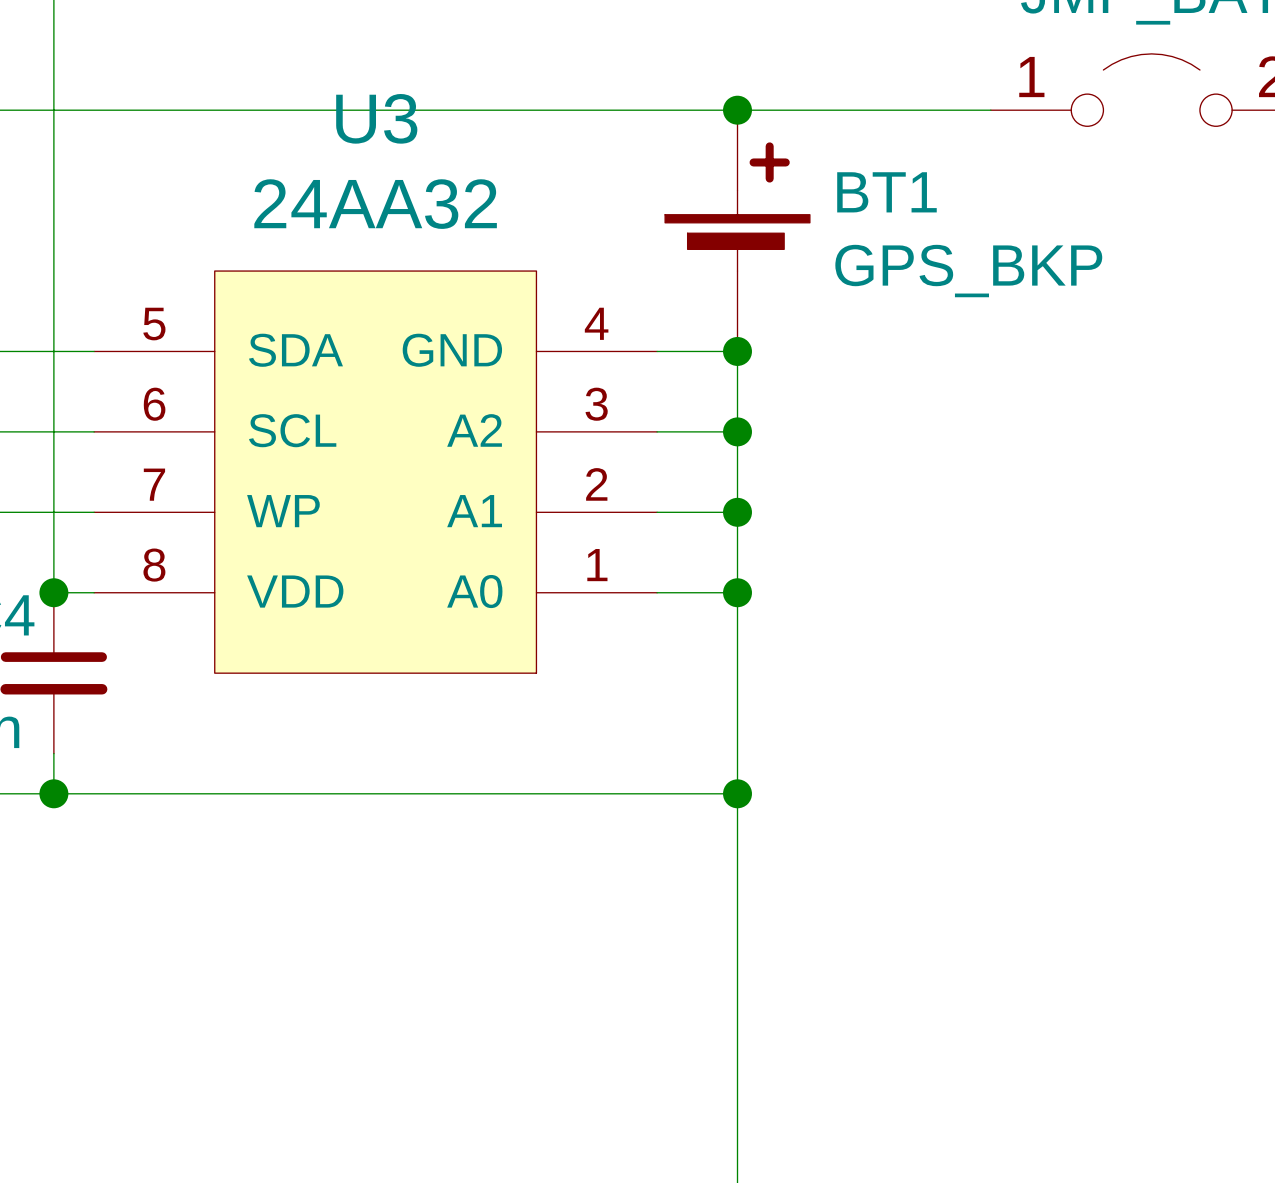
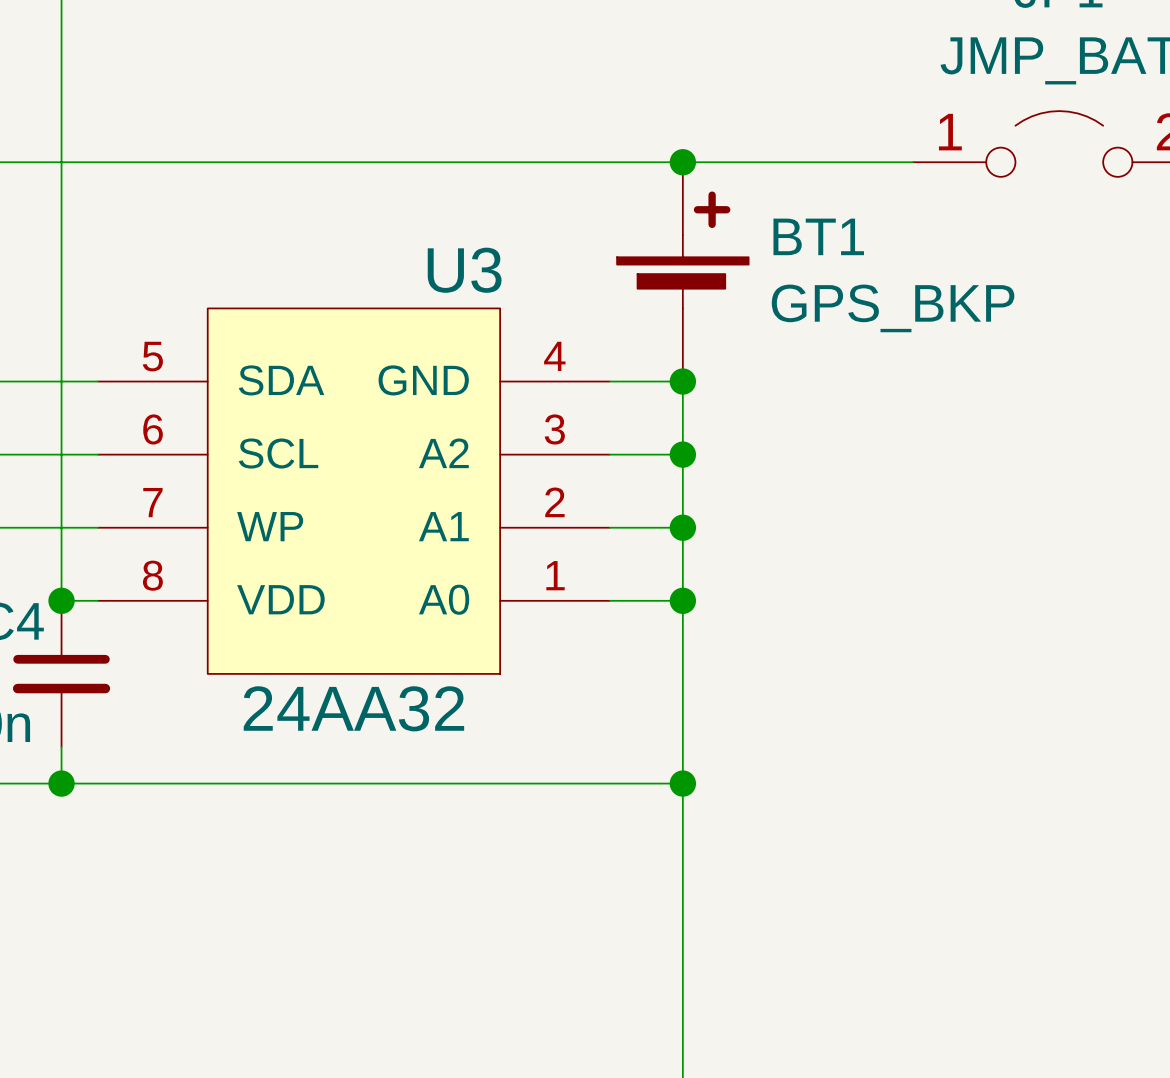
U3 name position: U3 (376, 118) -> U3 (464, 270)
U3 value position: 24AA32 (375, 204) -> 24AA32 (353, 708)

